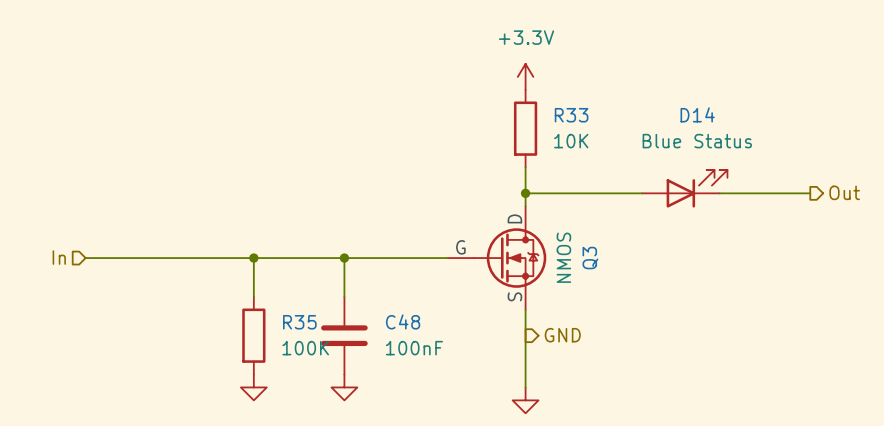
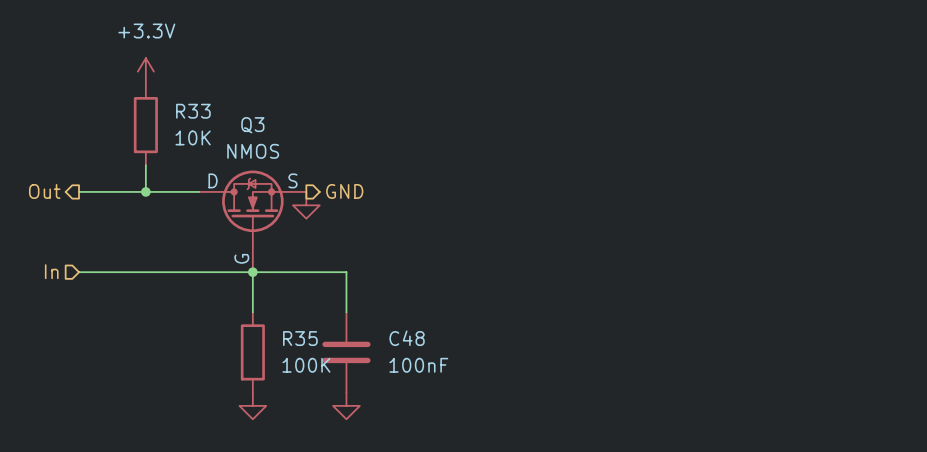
power symbol: none -> +3.3V (145, 71)
power symbol: +3.3V (525, 76) -> none
R33 position: (525, 128) -> (145, 125)
wire: none -> (145, 165) (145, 191)
wire: (525, 167) (525, 206) -> none
hierarchical label: none -> Out (44, 191)
hierarchical label: none -> GND (344, 191)
wire: none -> (79, 191) (199, 191)
junction: none -> (145, 191)
D14: Blue Status (684, 188) -> none
hierarchical label: Out (844, 192) -> none
power symbol: none -> (306, 205)
wire: (525, 193) (642, 193) -> none
junction: (525, 193) -> none
wire: (719, 193) (810, 193) -> none
wire: (344, 258) (447, 258) -> none
junction: (344, 258) -> none
Q3 position: (497, 258) -> (252, 221)
Q3 rotation: 0° (510, 258) -> 90° counterclockwise (252, 208)
wire: (525, 309) (525, 387) -> none
hierarchical label: GND (562, 335) -> none
power symbol: (525, 400) -> none

